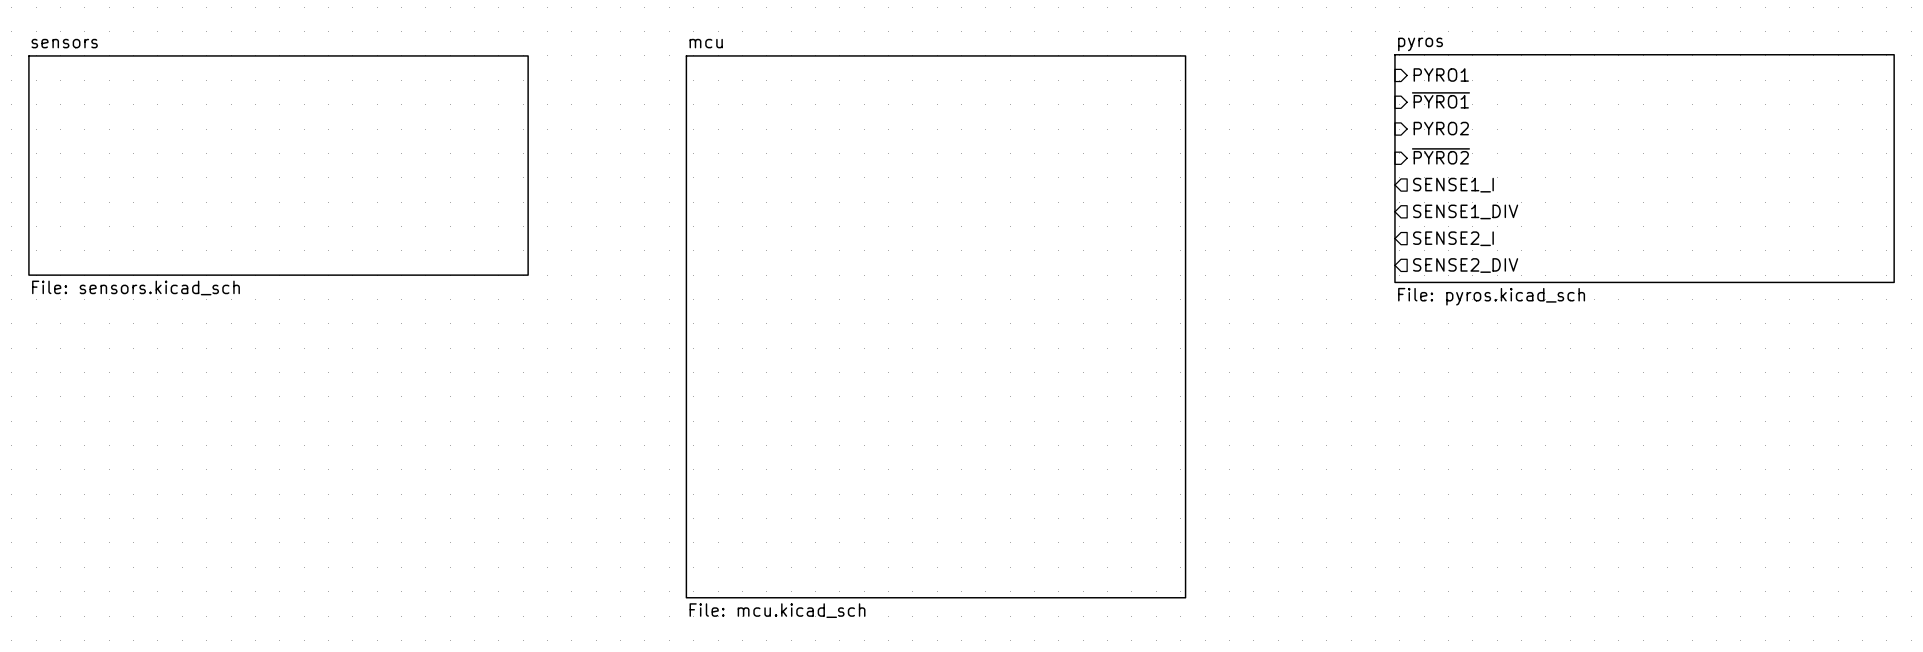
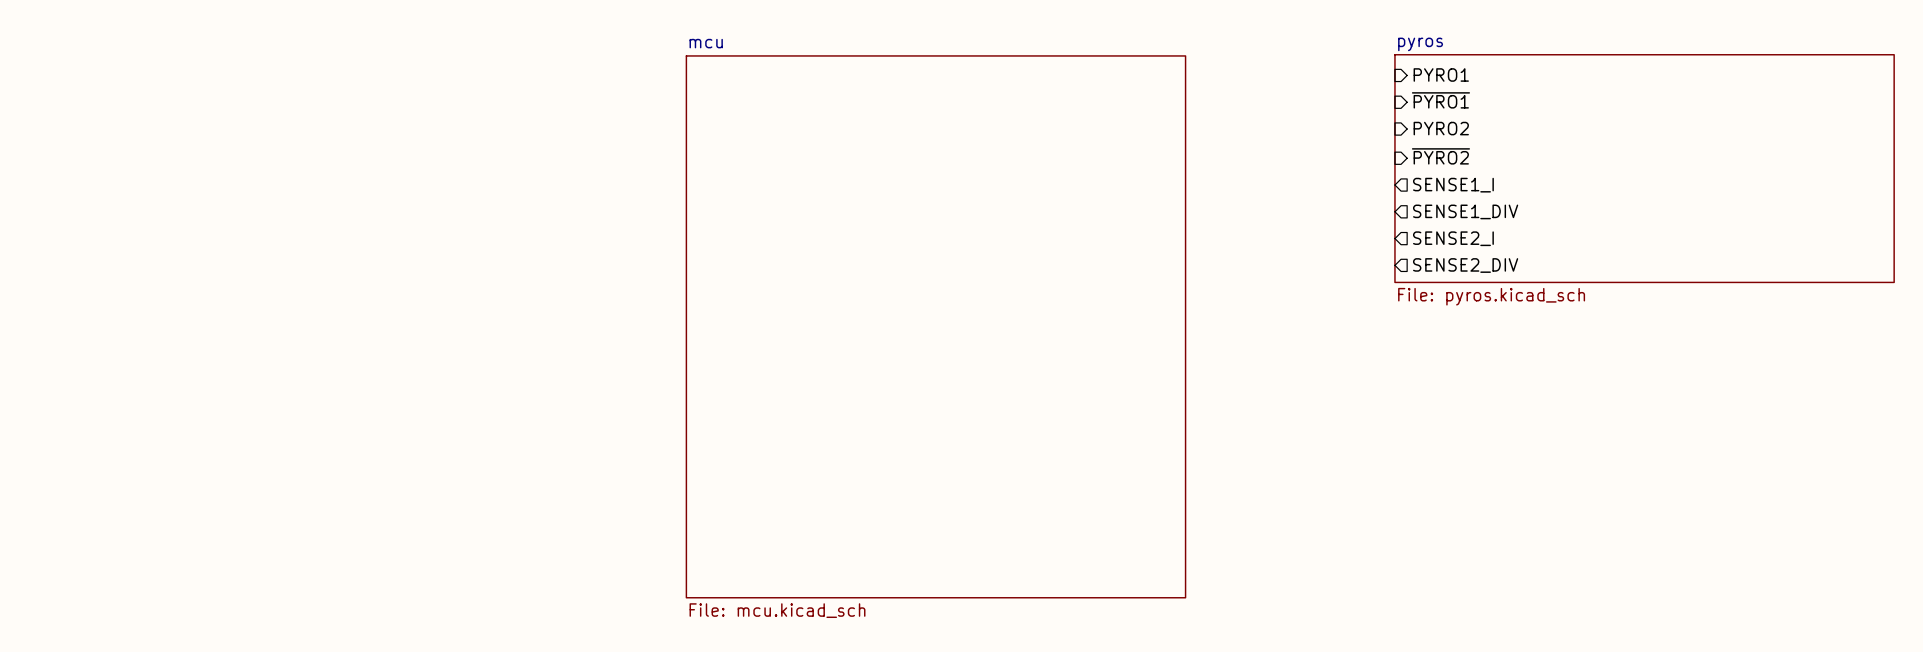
sheet sensors: File: sensors.kicad_sch (278, 165) -> none

